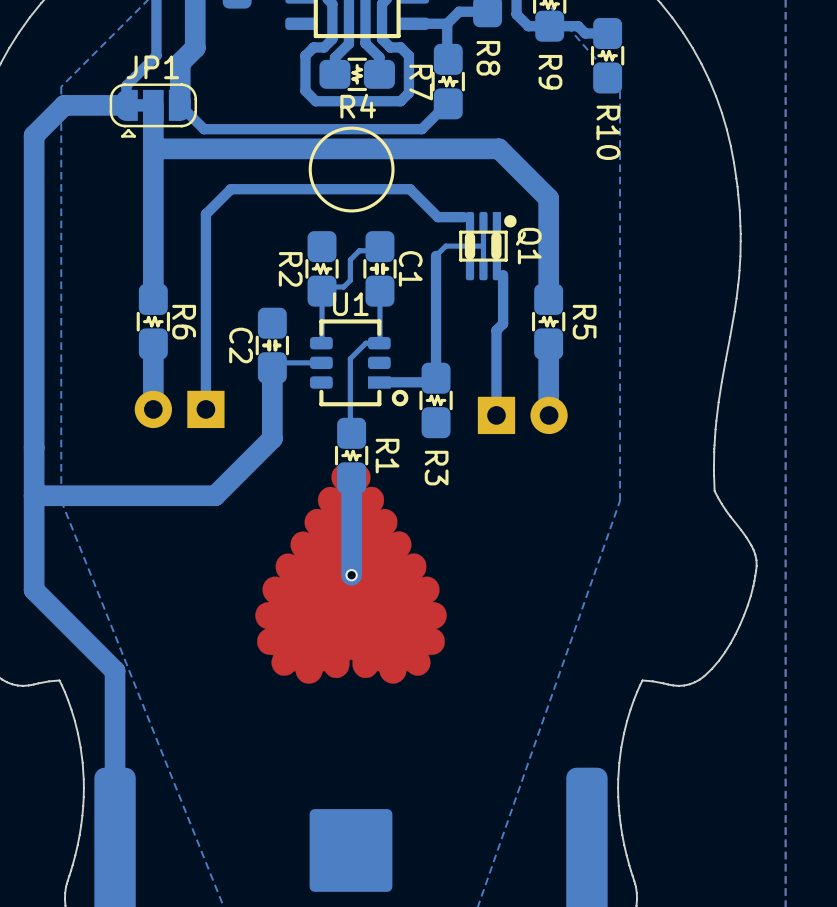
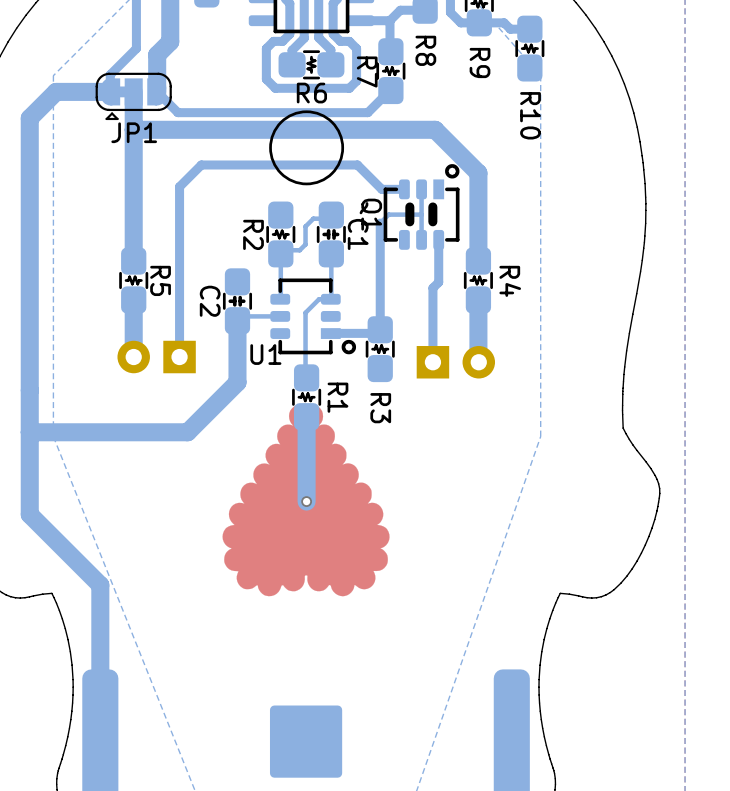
JP1 name position: JP1 (152, 67) -> JP1 (134, 132)
R4 name: R4 (358, 106) -> R6 (311, 93)
Q1 footprint: [459, 211, 517, 281] -> [383, 164, 460, 250]
Q1 name position: Q1 (528, 246) -> Q1 (370, 214)
U1 name position: U1 (350, 304) -> U1 (265, 354)
R6 name: R6 (184, 322) -> R5 (160, 280)
R5 name: R5 (584, 322) -> R4 (510, 281)

